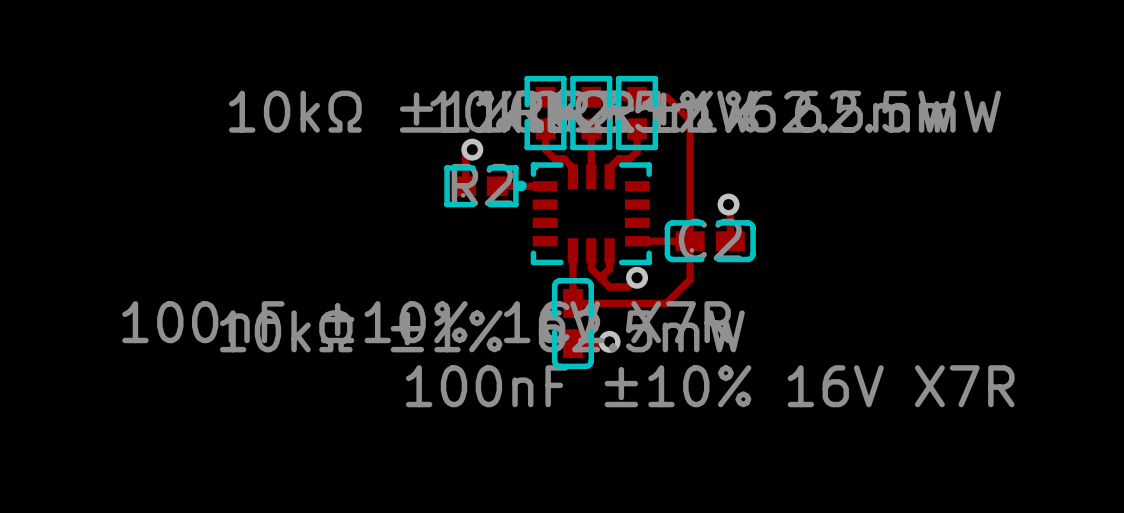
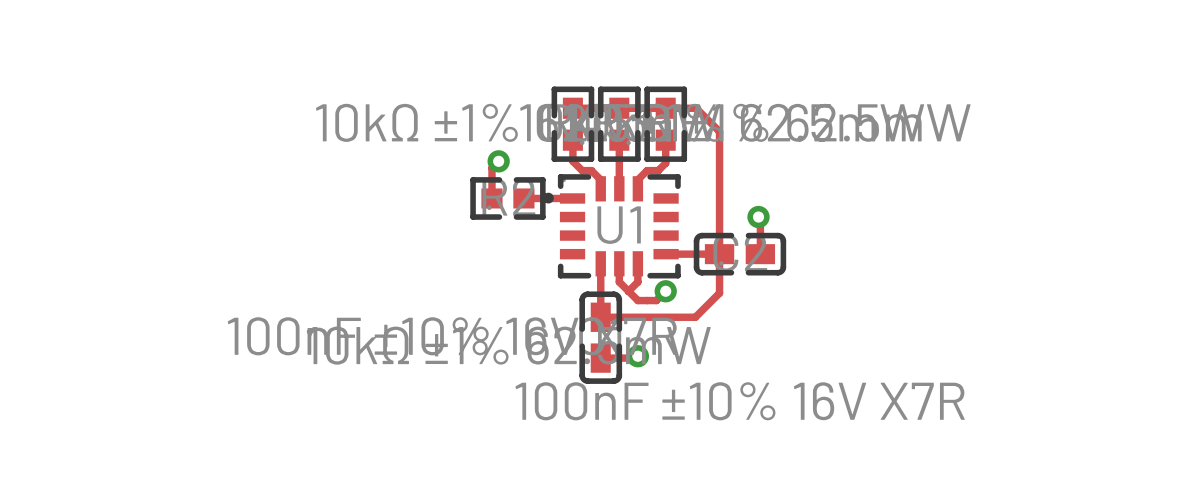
U1 name: none -> U1 (619, 225)

